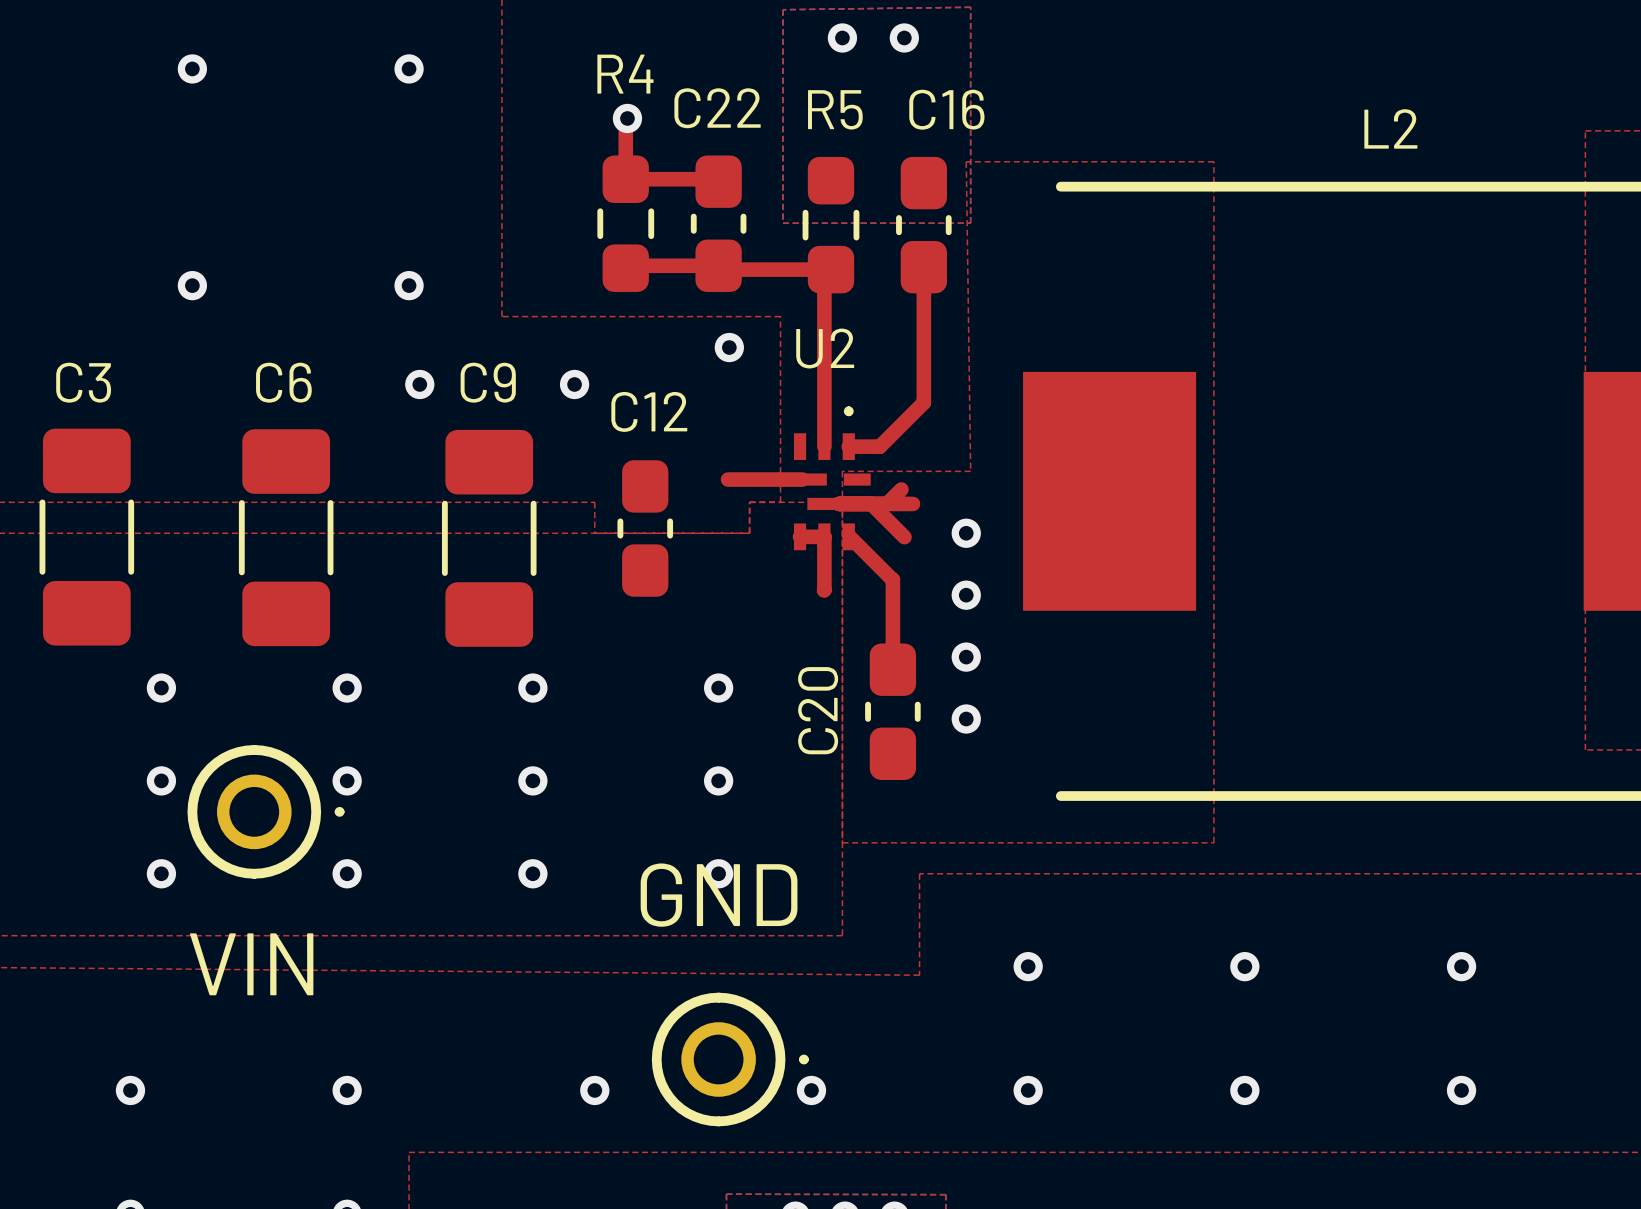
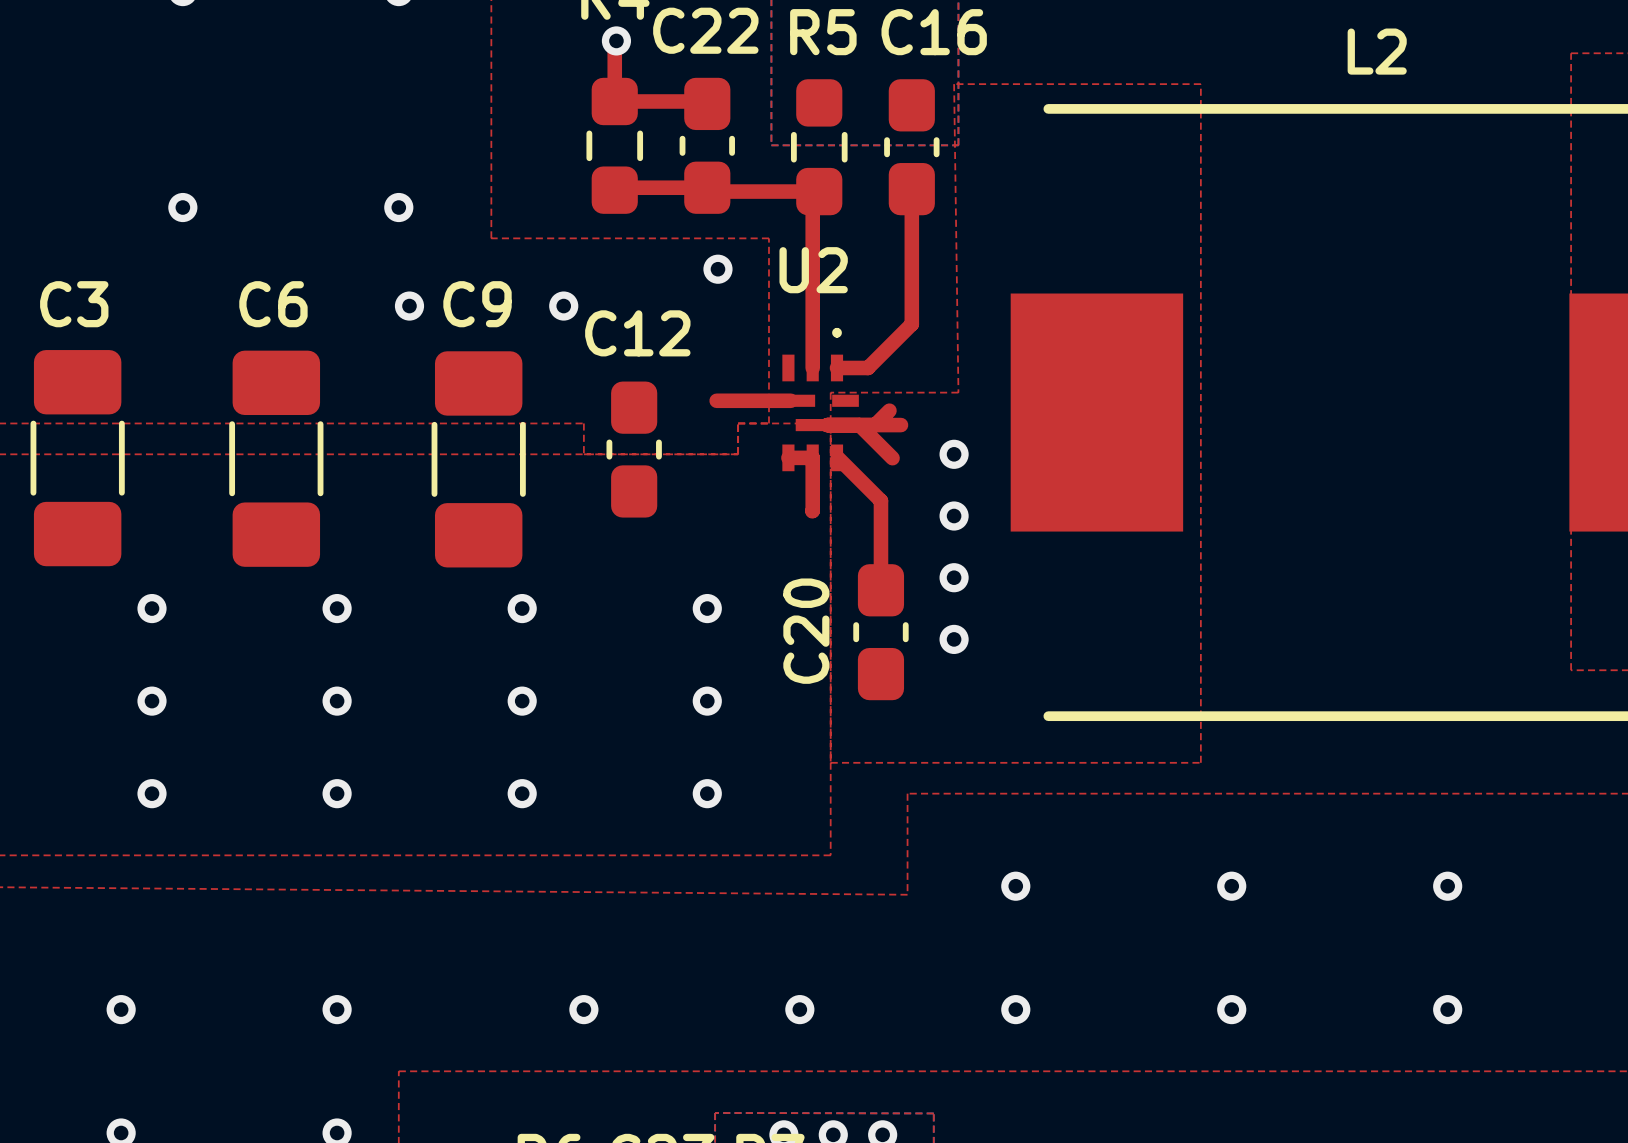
VIN: (265, 811) -> none
GND: (730, 1059) -> none

